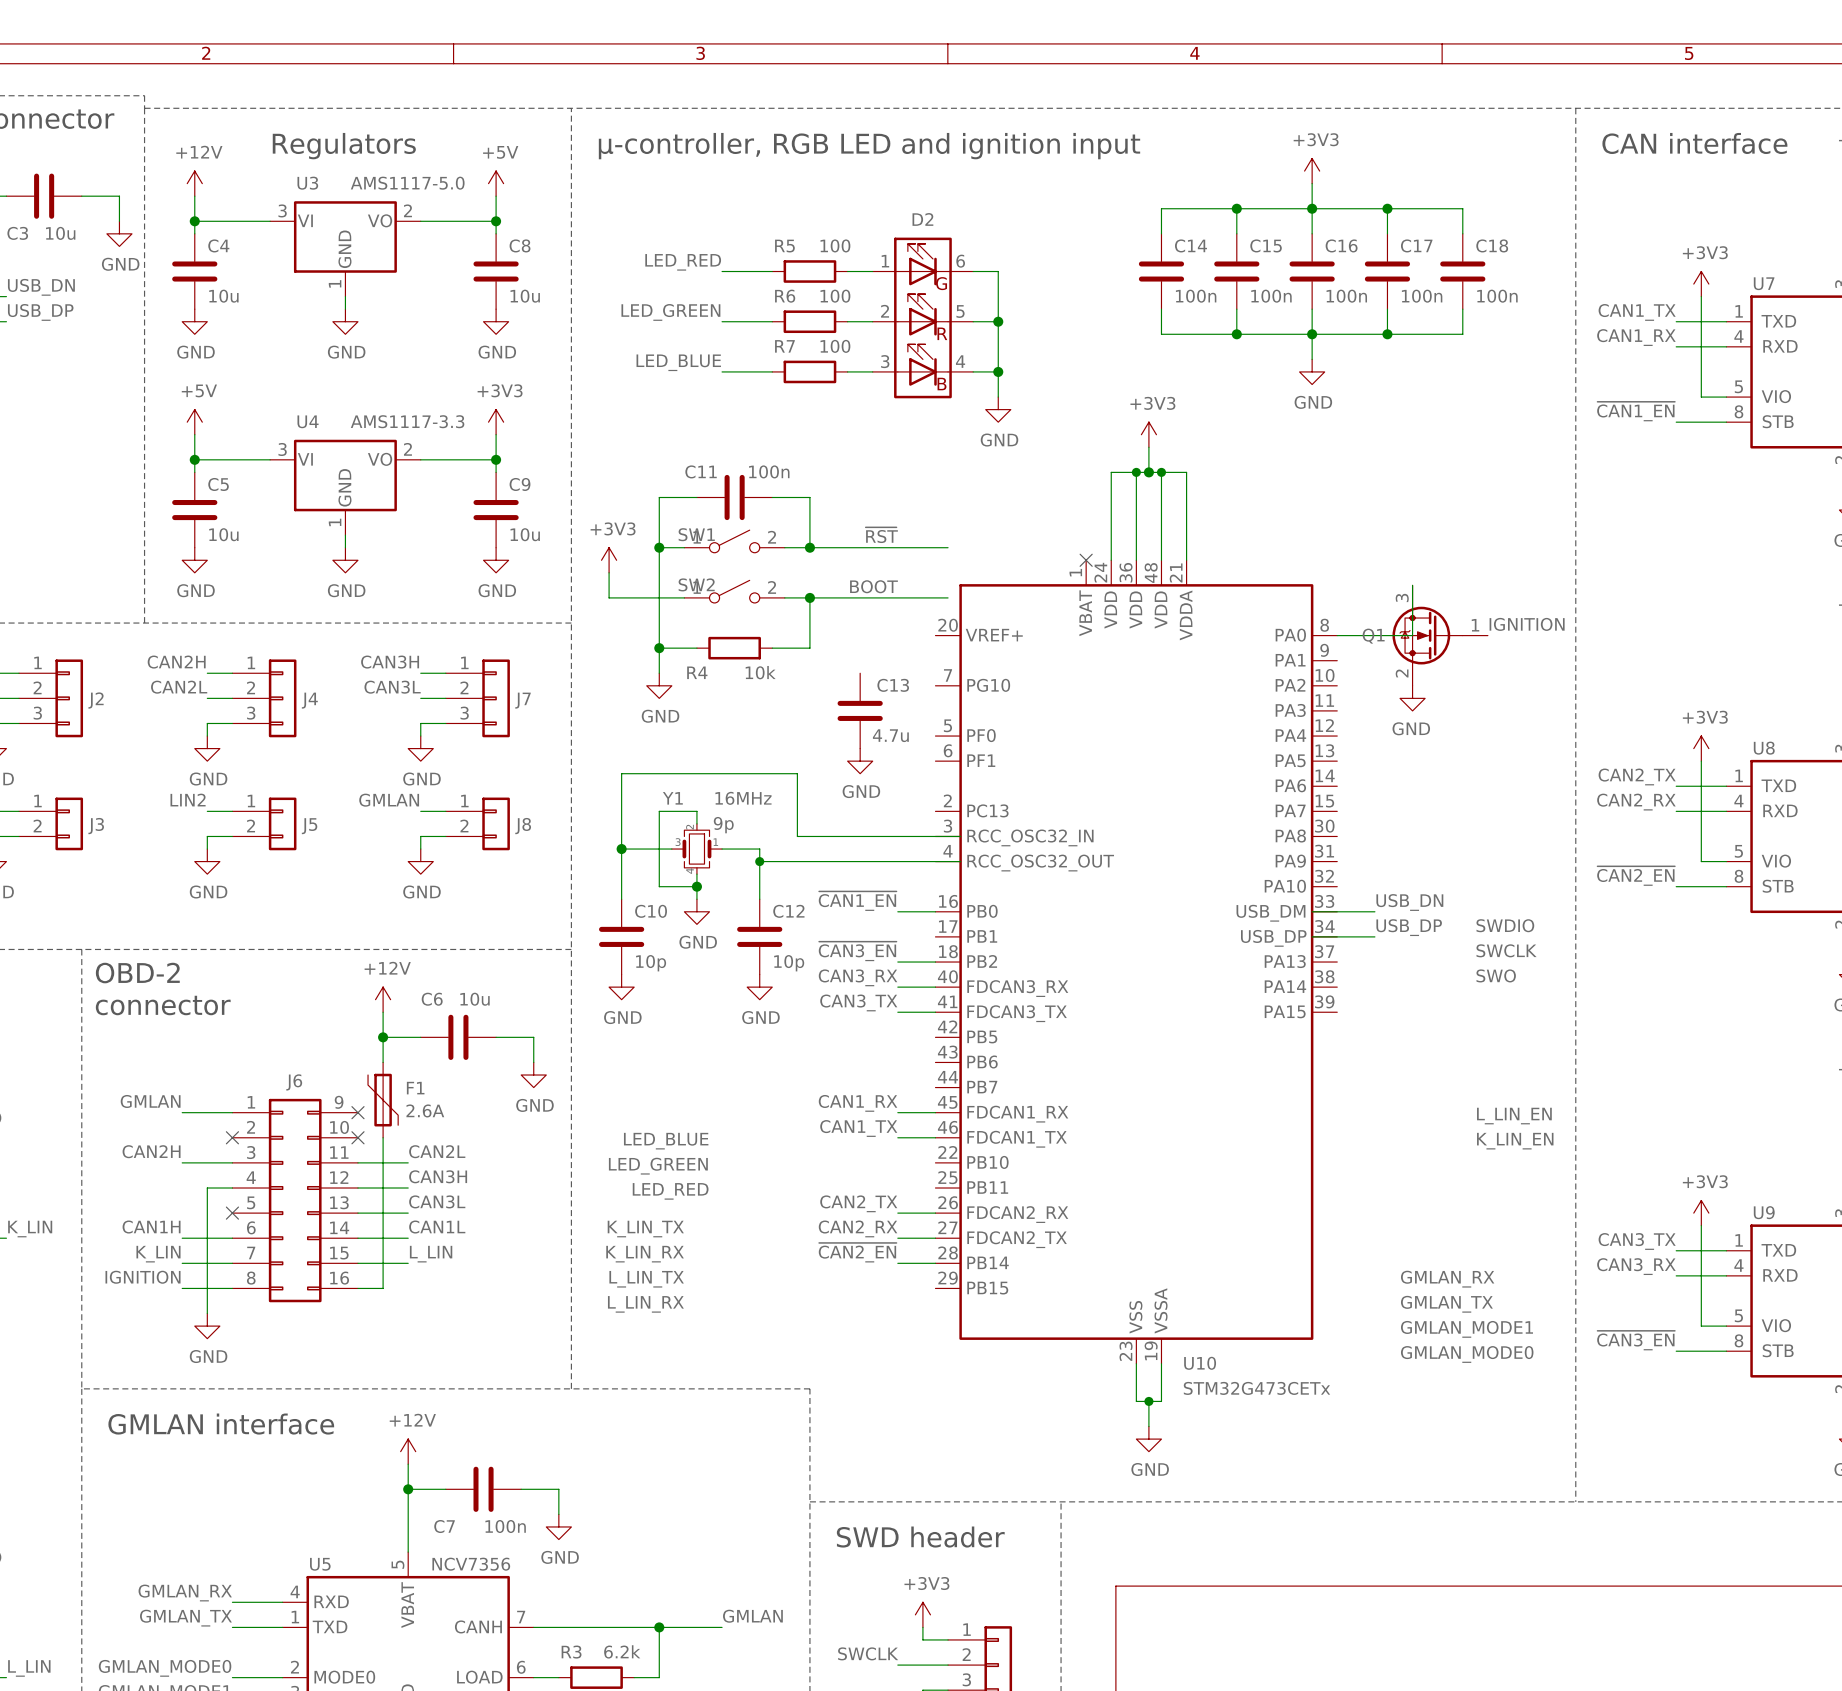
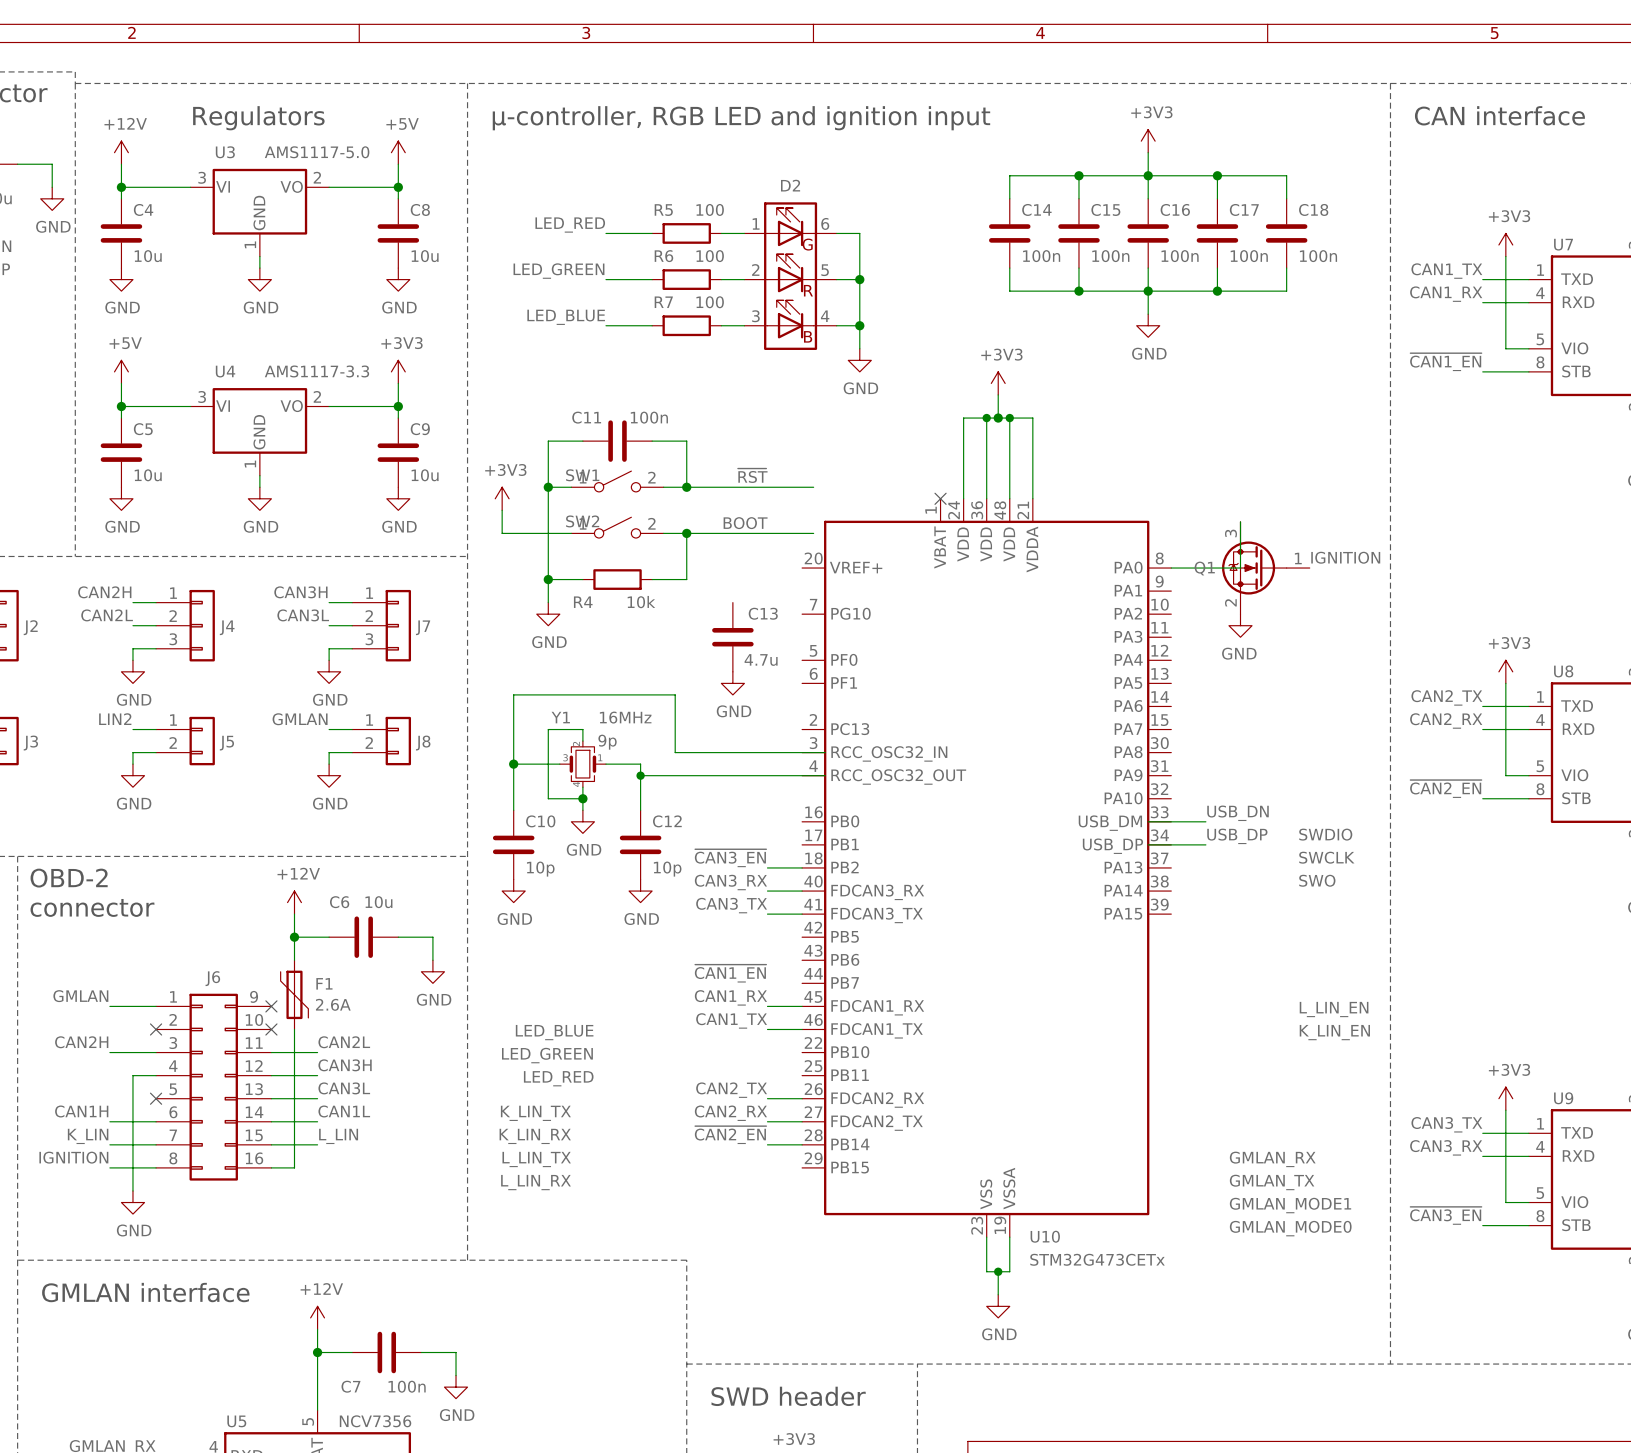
label position: ~{CAN1_EN} (857, 901) -> ~{CAN1_EN} (730, 973)
wire: (897, 911) (935, 911) -> none

